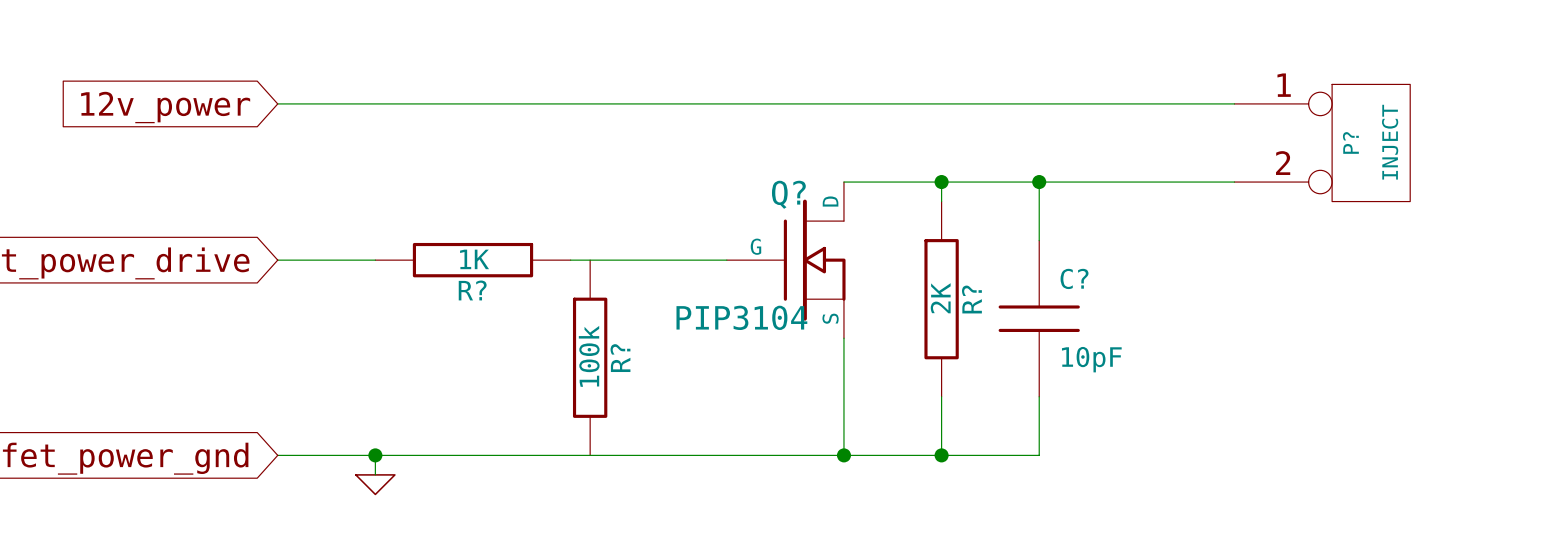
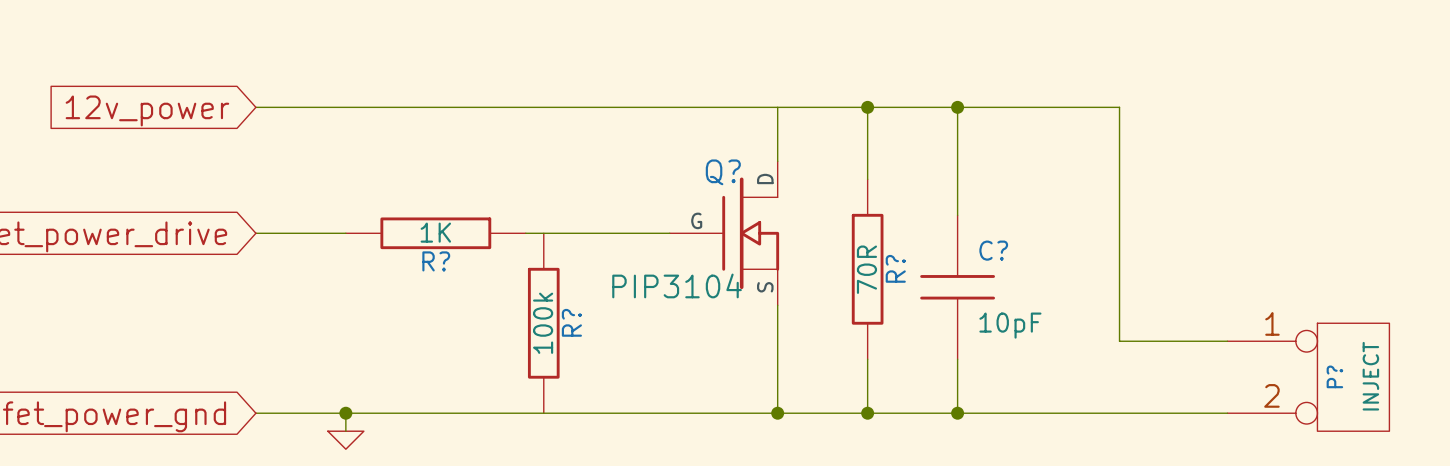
wire: (277, 103) (1234, 103) -> none
global label position: 12v_power (165, 107) -> 12v_power (147, 110)
wire: none -> (255, 107) (1119, 107) (1119, 341) (1227, 341)
wire: none -> (867, 107) (867, 161)
junction: none -> (867, 107)
wire: none -> (957, 107) (957, 161)
junction: none -> (957, 107)
P? position: (1322, 142) -> (1308, 377)
wire: (843, 182) (1234, 182) -> (777, 161) (777, 107)
junction: (941, 182) -> none
junction: (1039, 182) -> none
R? value: 2K (940, 298) -> 70R (866, 269)
wire: none -> (957, 413) (1227, 413)
junction: none -> (957, 413)

